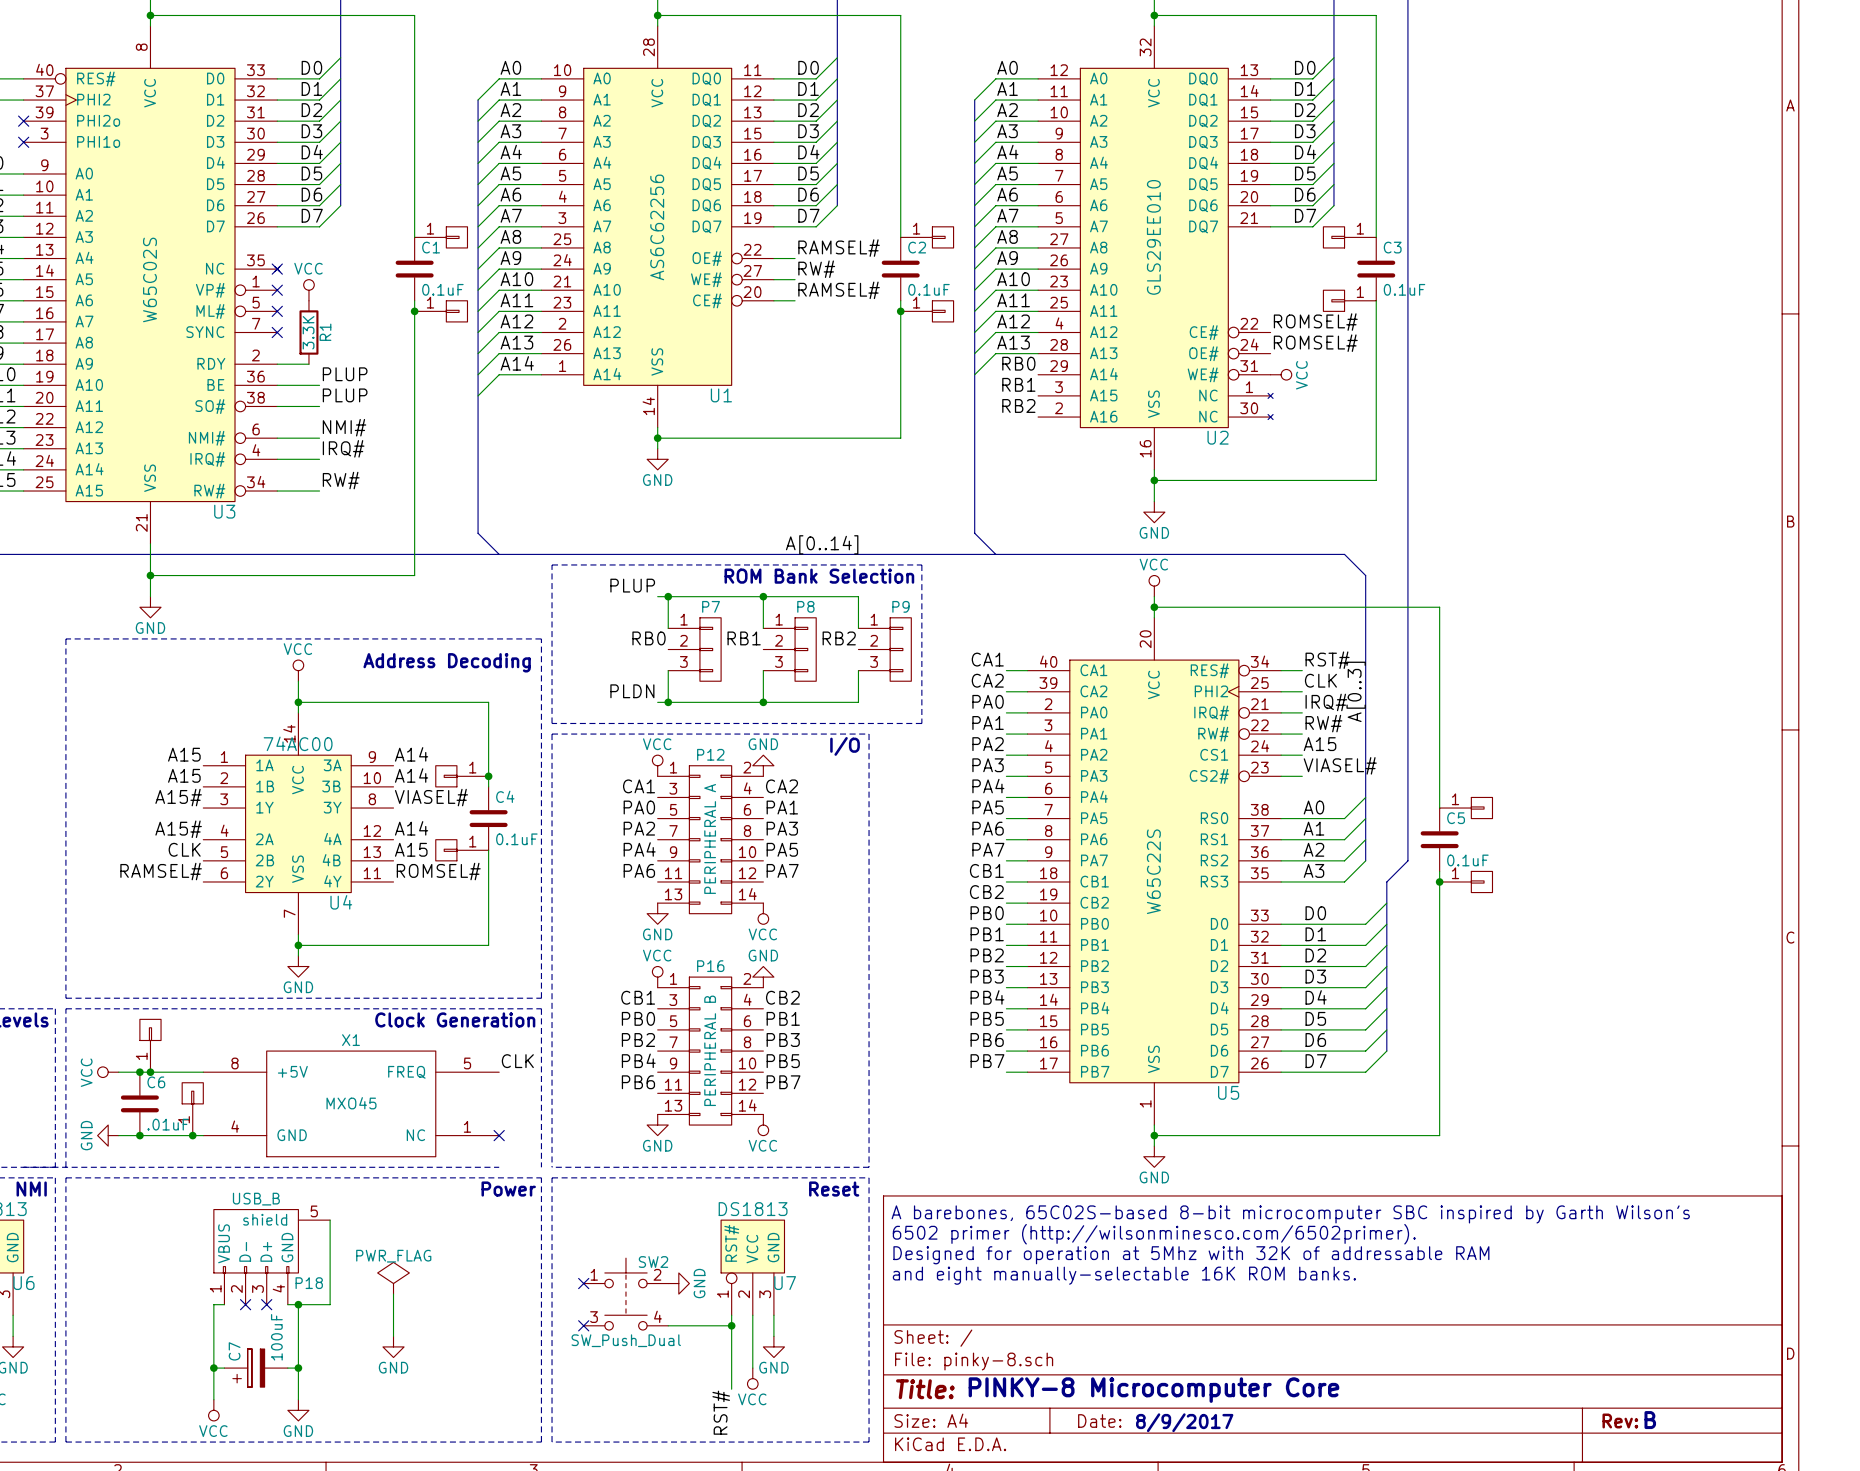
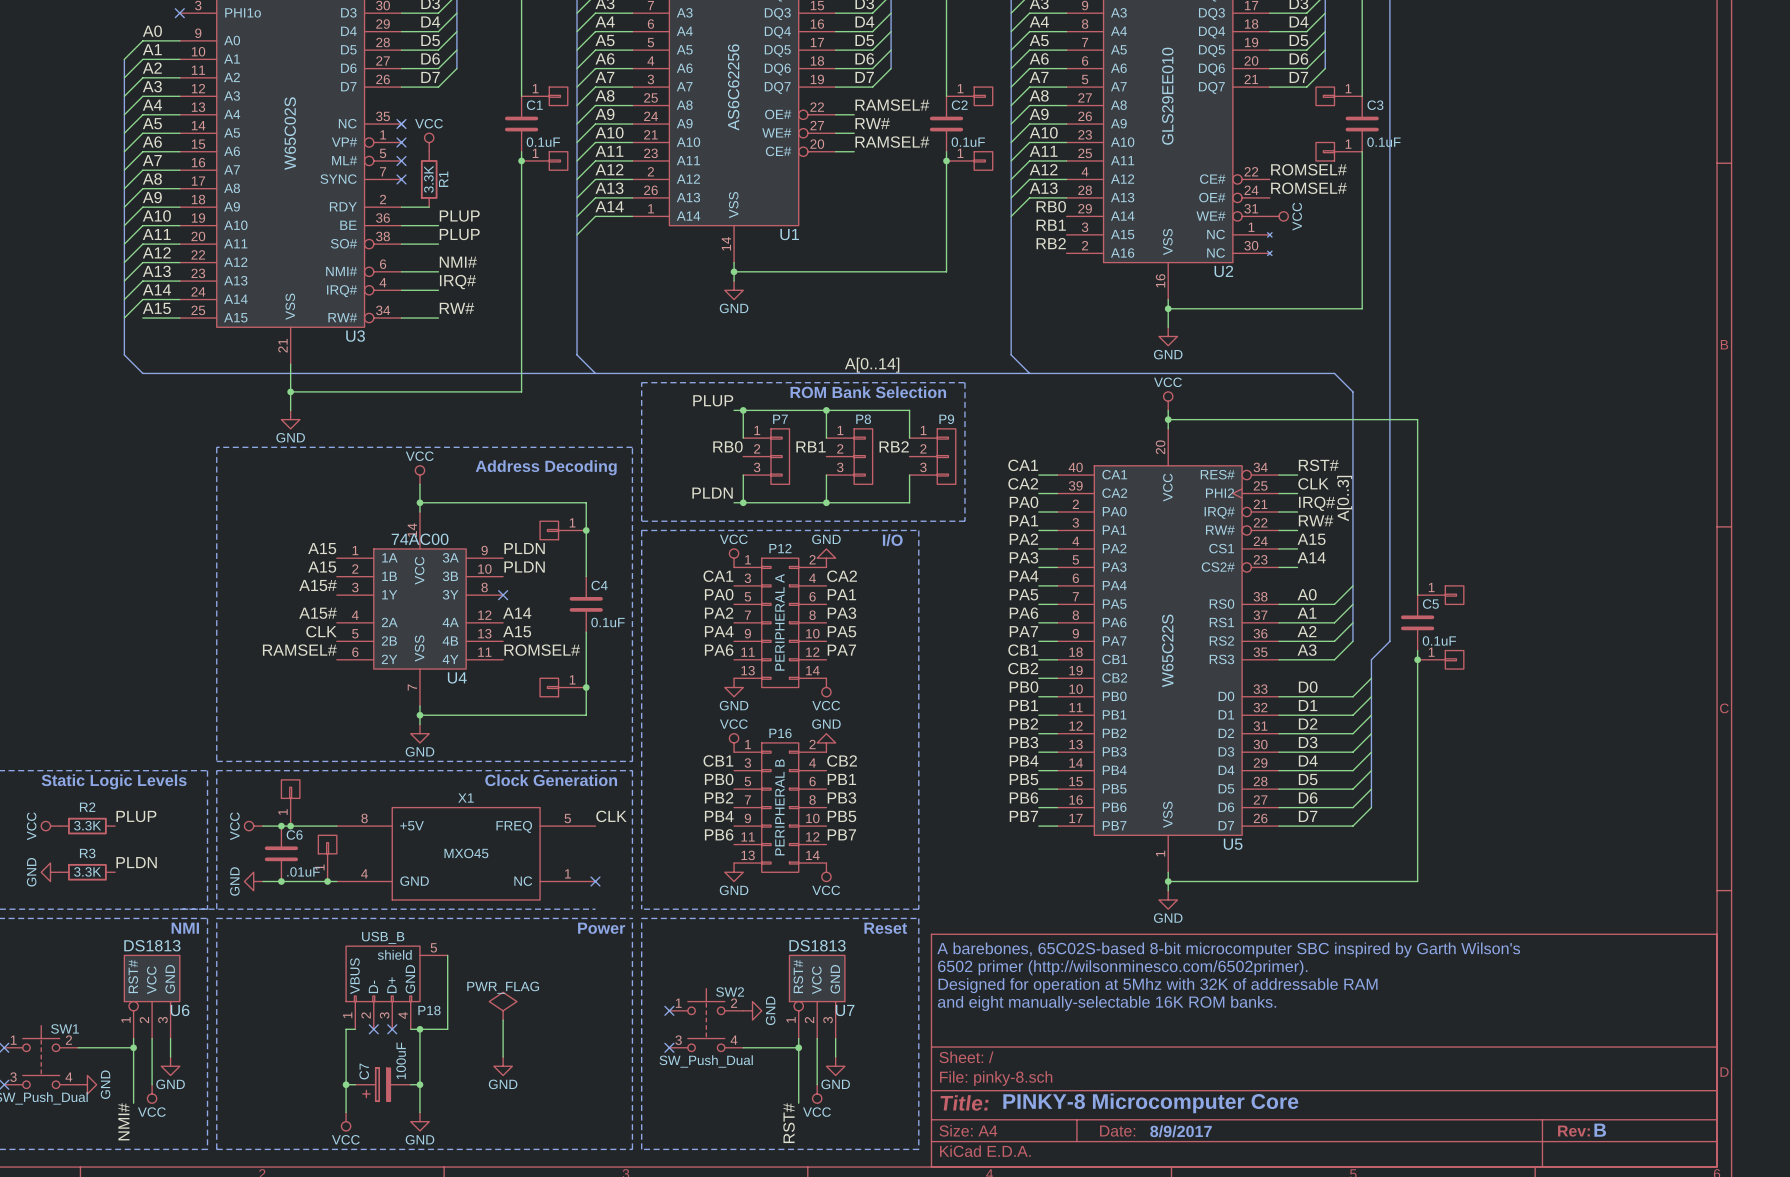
label: A14 (411, 754) -> PLDN (524, 548)
label: VIASEL# (1340, 765) -> A14 (1311, 557)
label: A14 (411, 775) -> PLDN (524, 566)
part position: (462, 776) -> (563, 530)
junction position: (488, 776) -> (586, 530)
label: VIASEL# (431, 797) -> none
no-connect mark: none -> (503, 595)
part: (462, 850) -> none
part: none -> (563, 687)
junction: none -> (586, 687)

